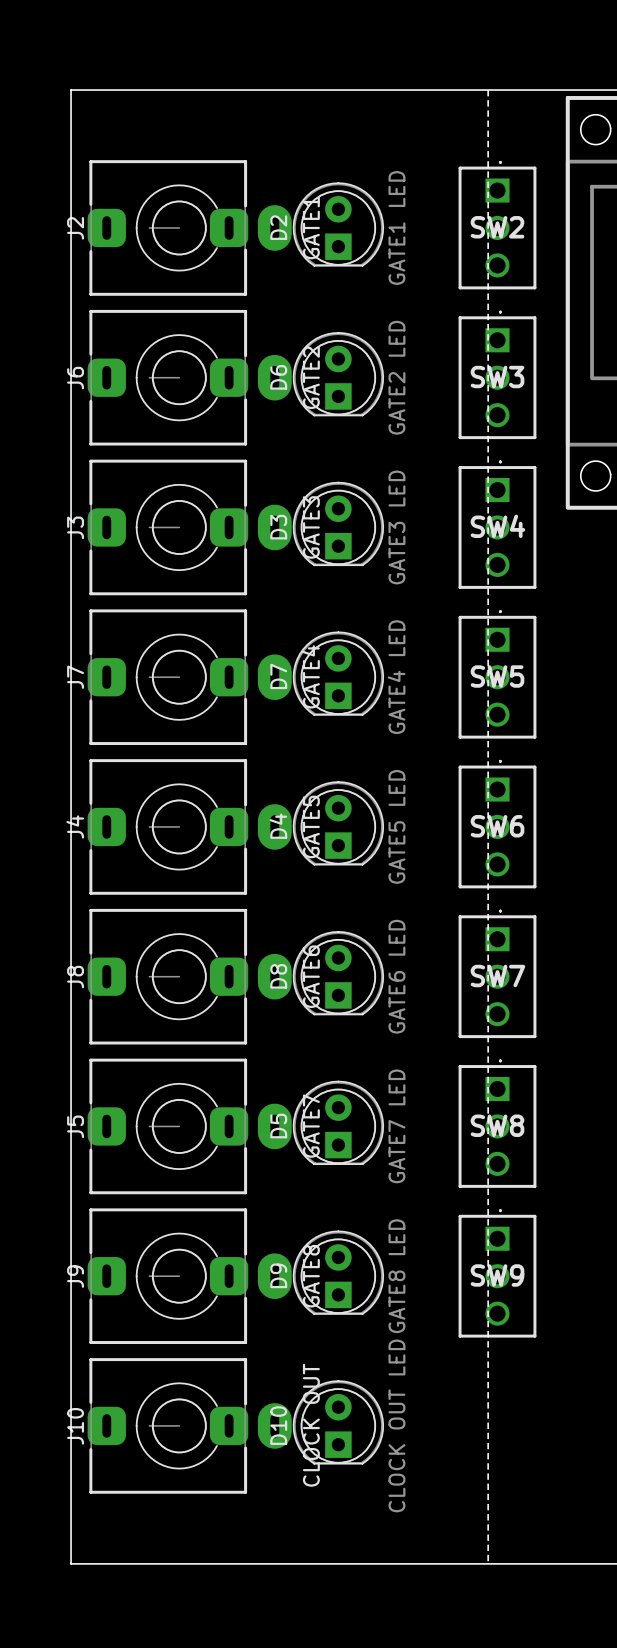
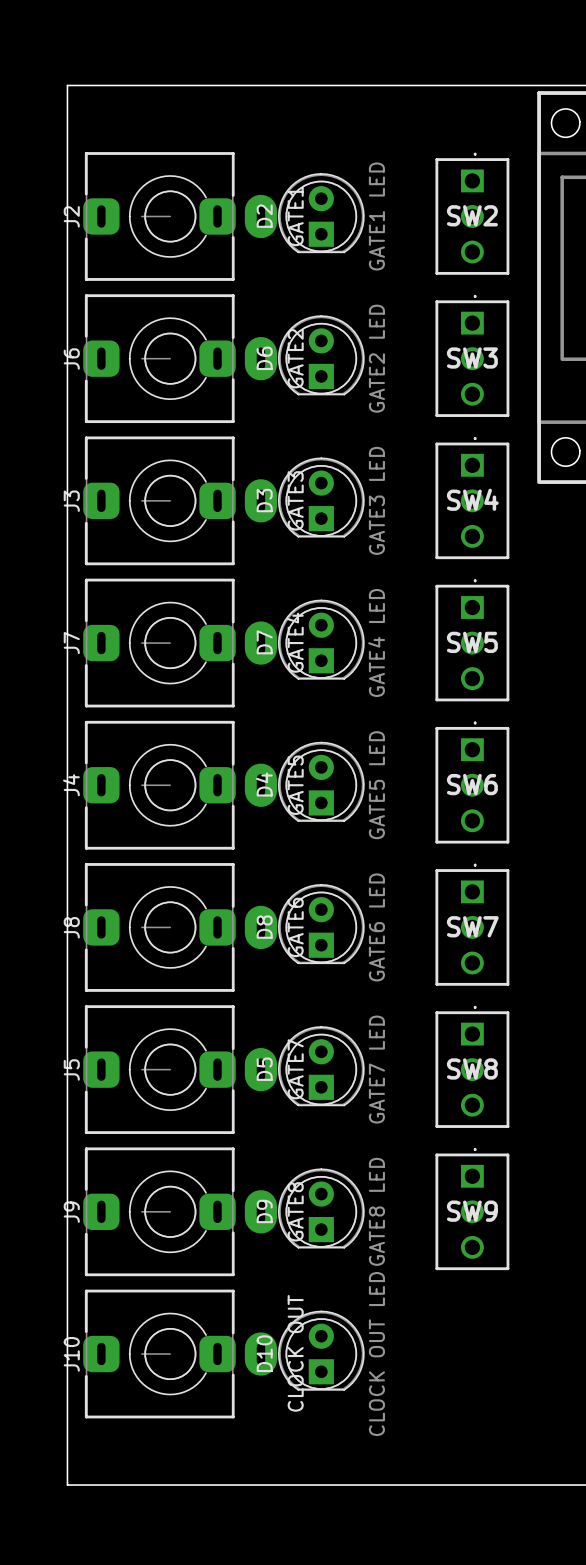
board edge: (488, 90) (488, 1563) -> none

